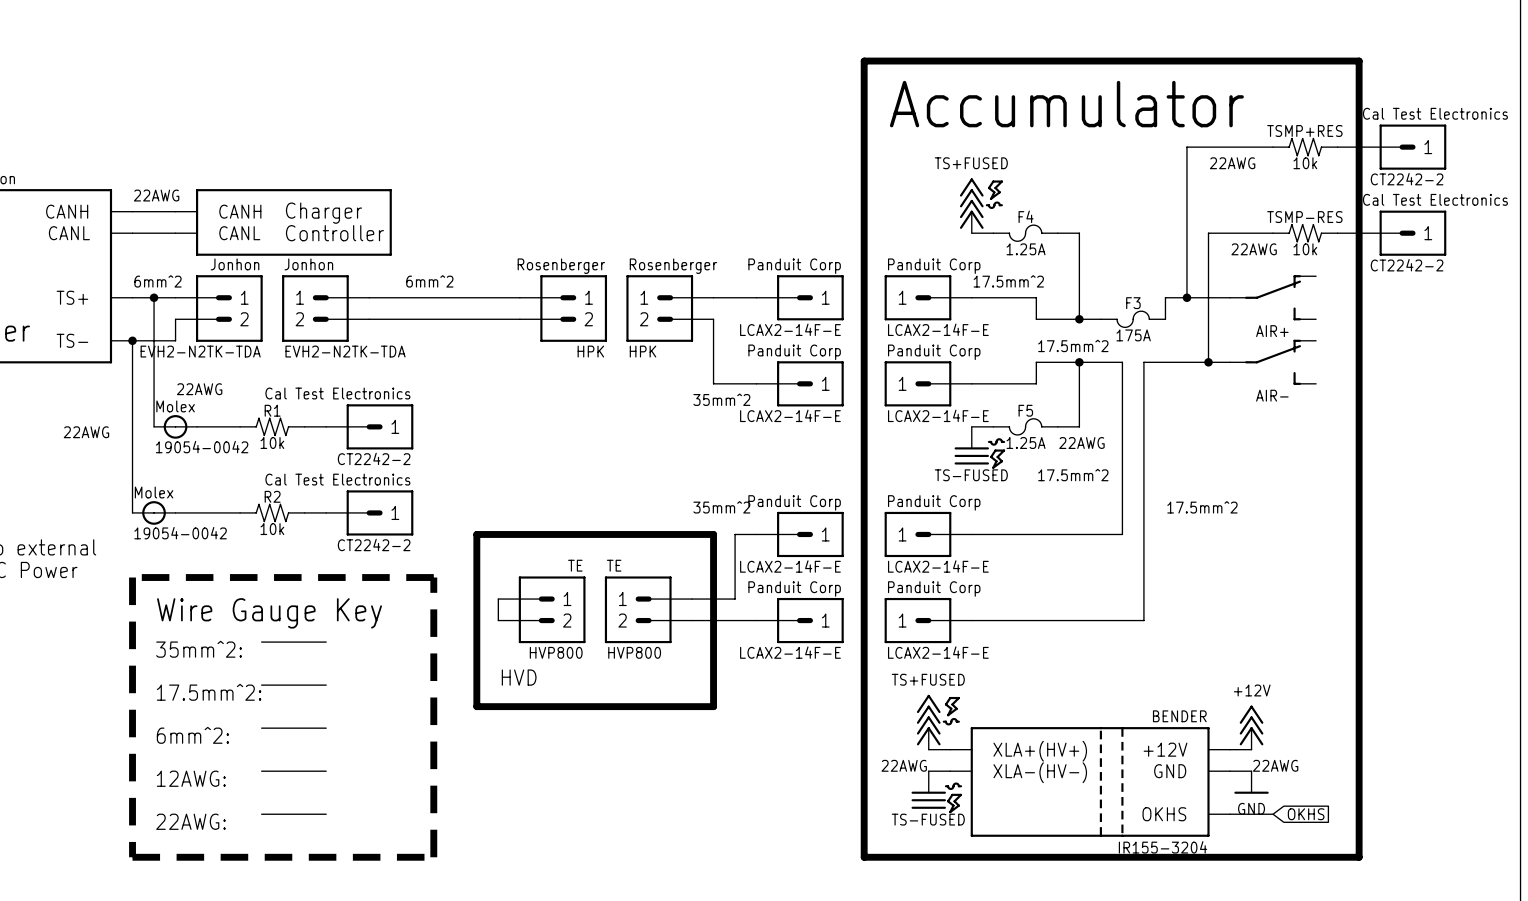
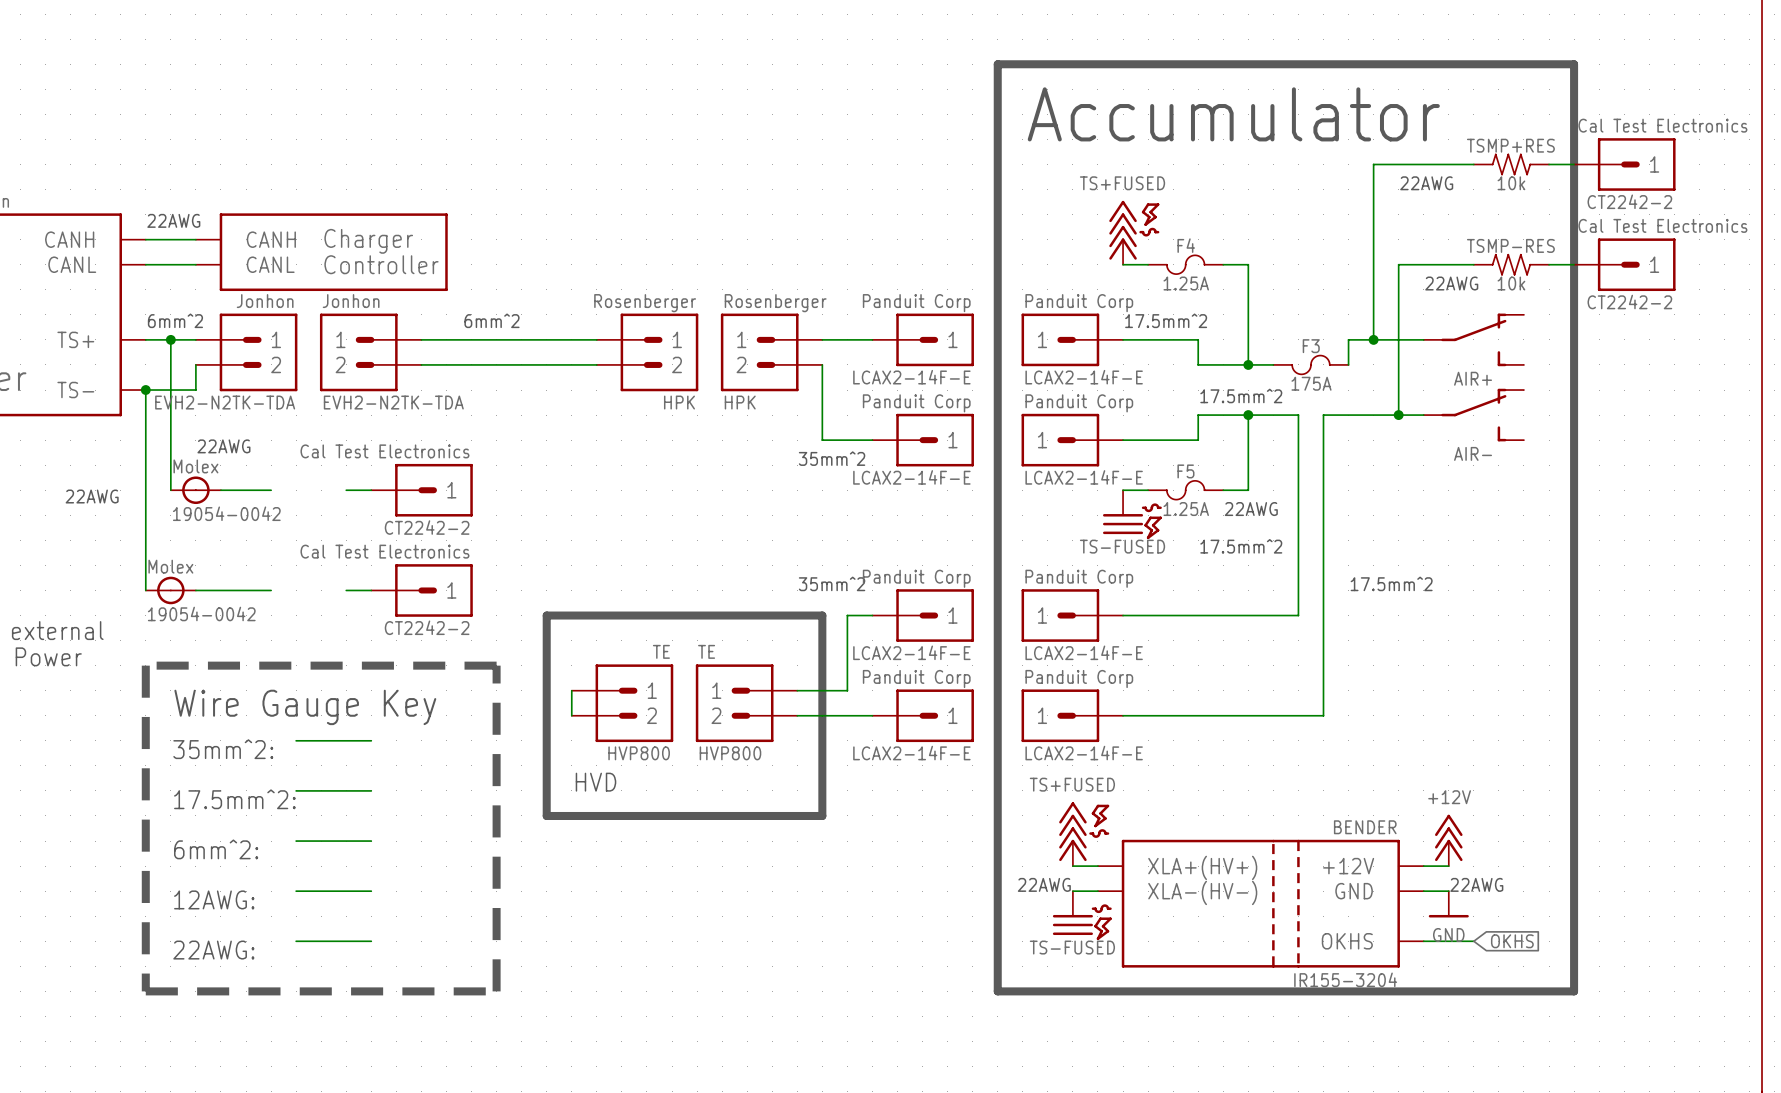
R1: 10k (272, 426) -> none
R2: 10k (272, 512) -> none

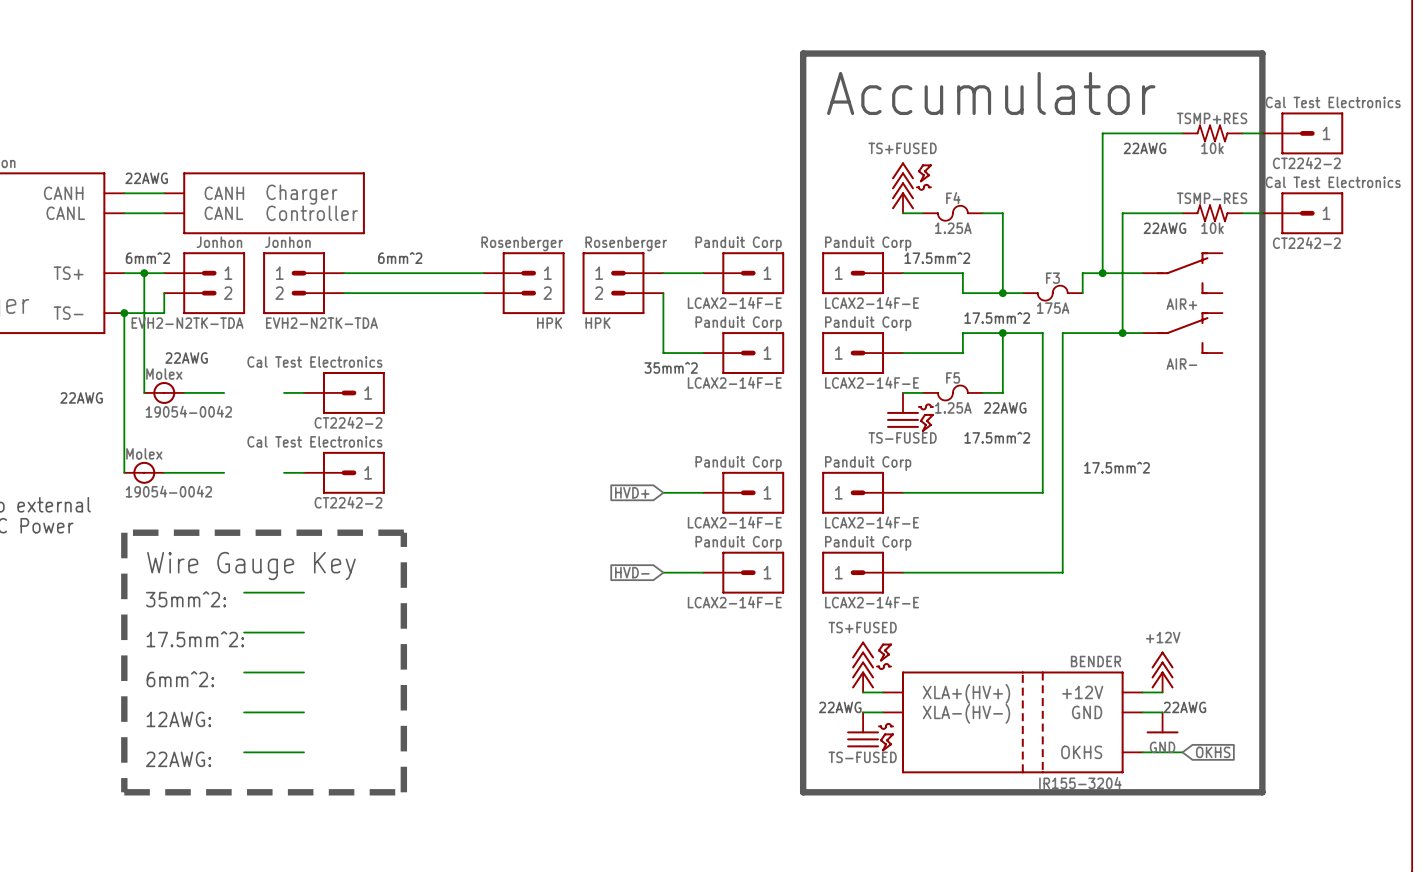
text: 35mm^2 (832, 583) -> none
line: (546, 615) (546, 815) (822, 815) (822, 615) (546, 615) -> none
global label: none -> HVD+ (632, 492)
wire: (847, 615) (847, 690) (797, 690) -> (683, 492) (663, 492)
wire: (571, 690) (571, 715) -> none
part: (622, 703) -> none
part: (746, 703) -> none
global label: none -> HVD- (632, 572)
wire: (797, 715) (822, 715) -> none
text: HVD (596, 782) -> none

